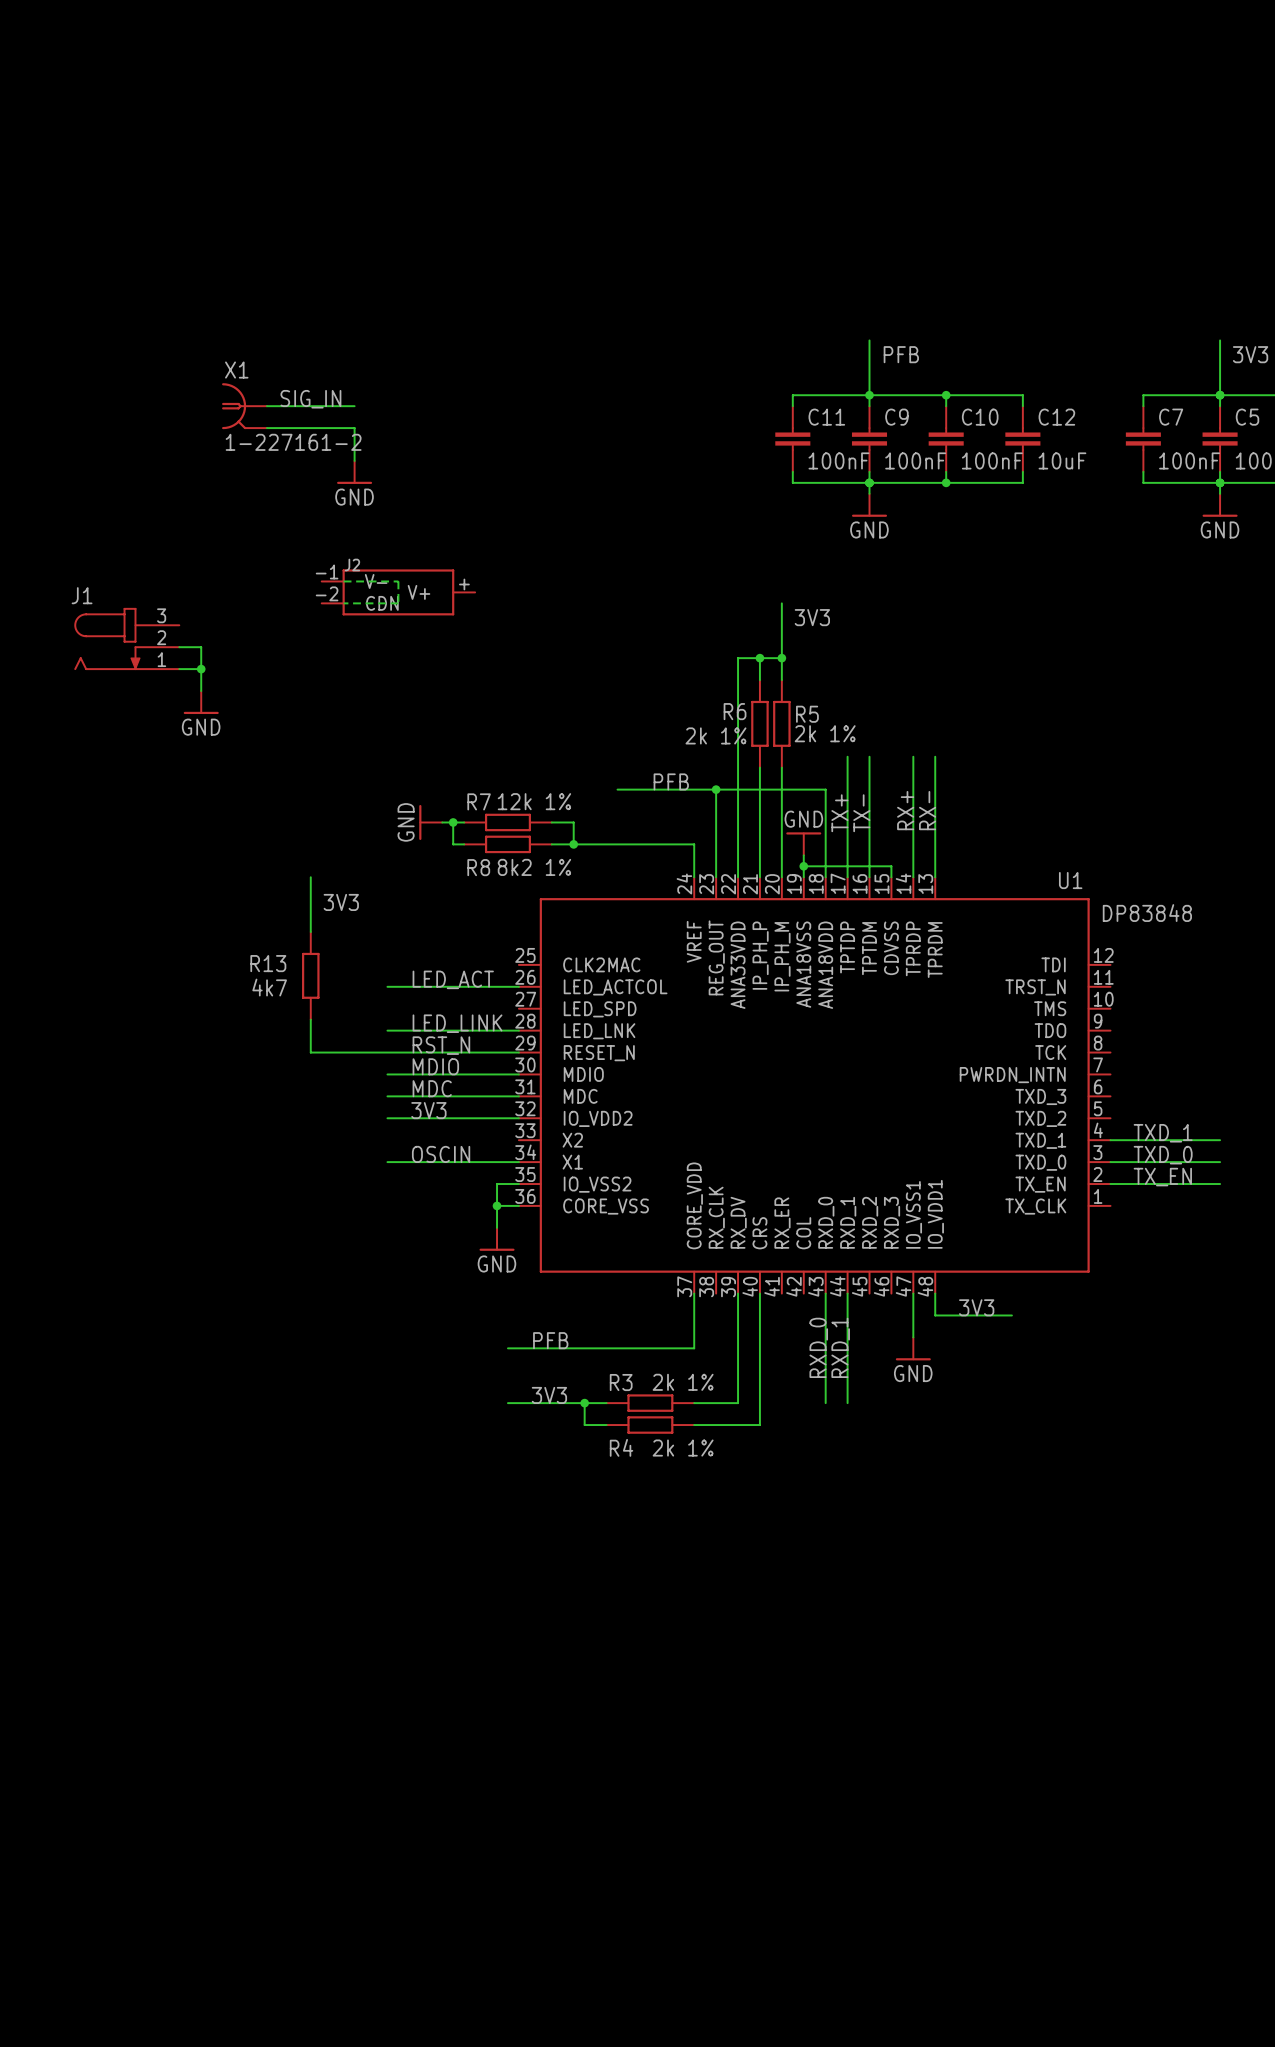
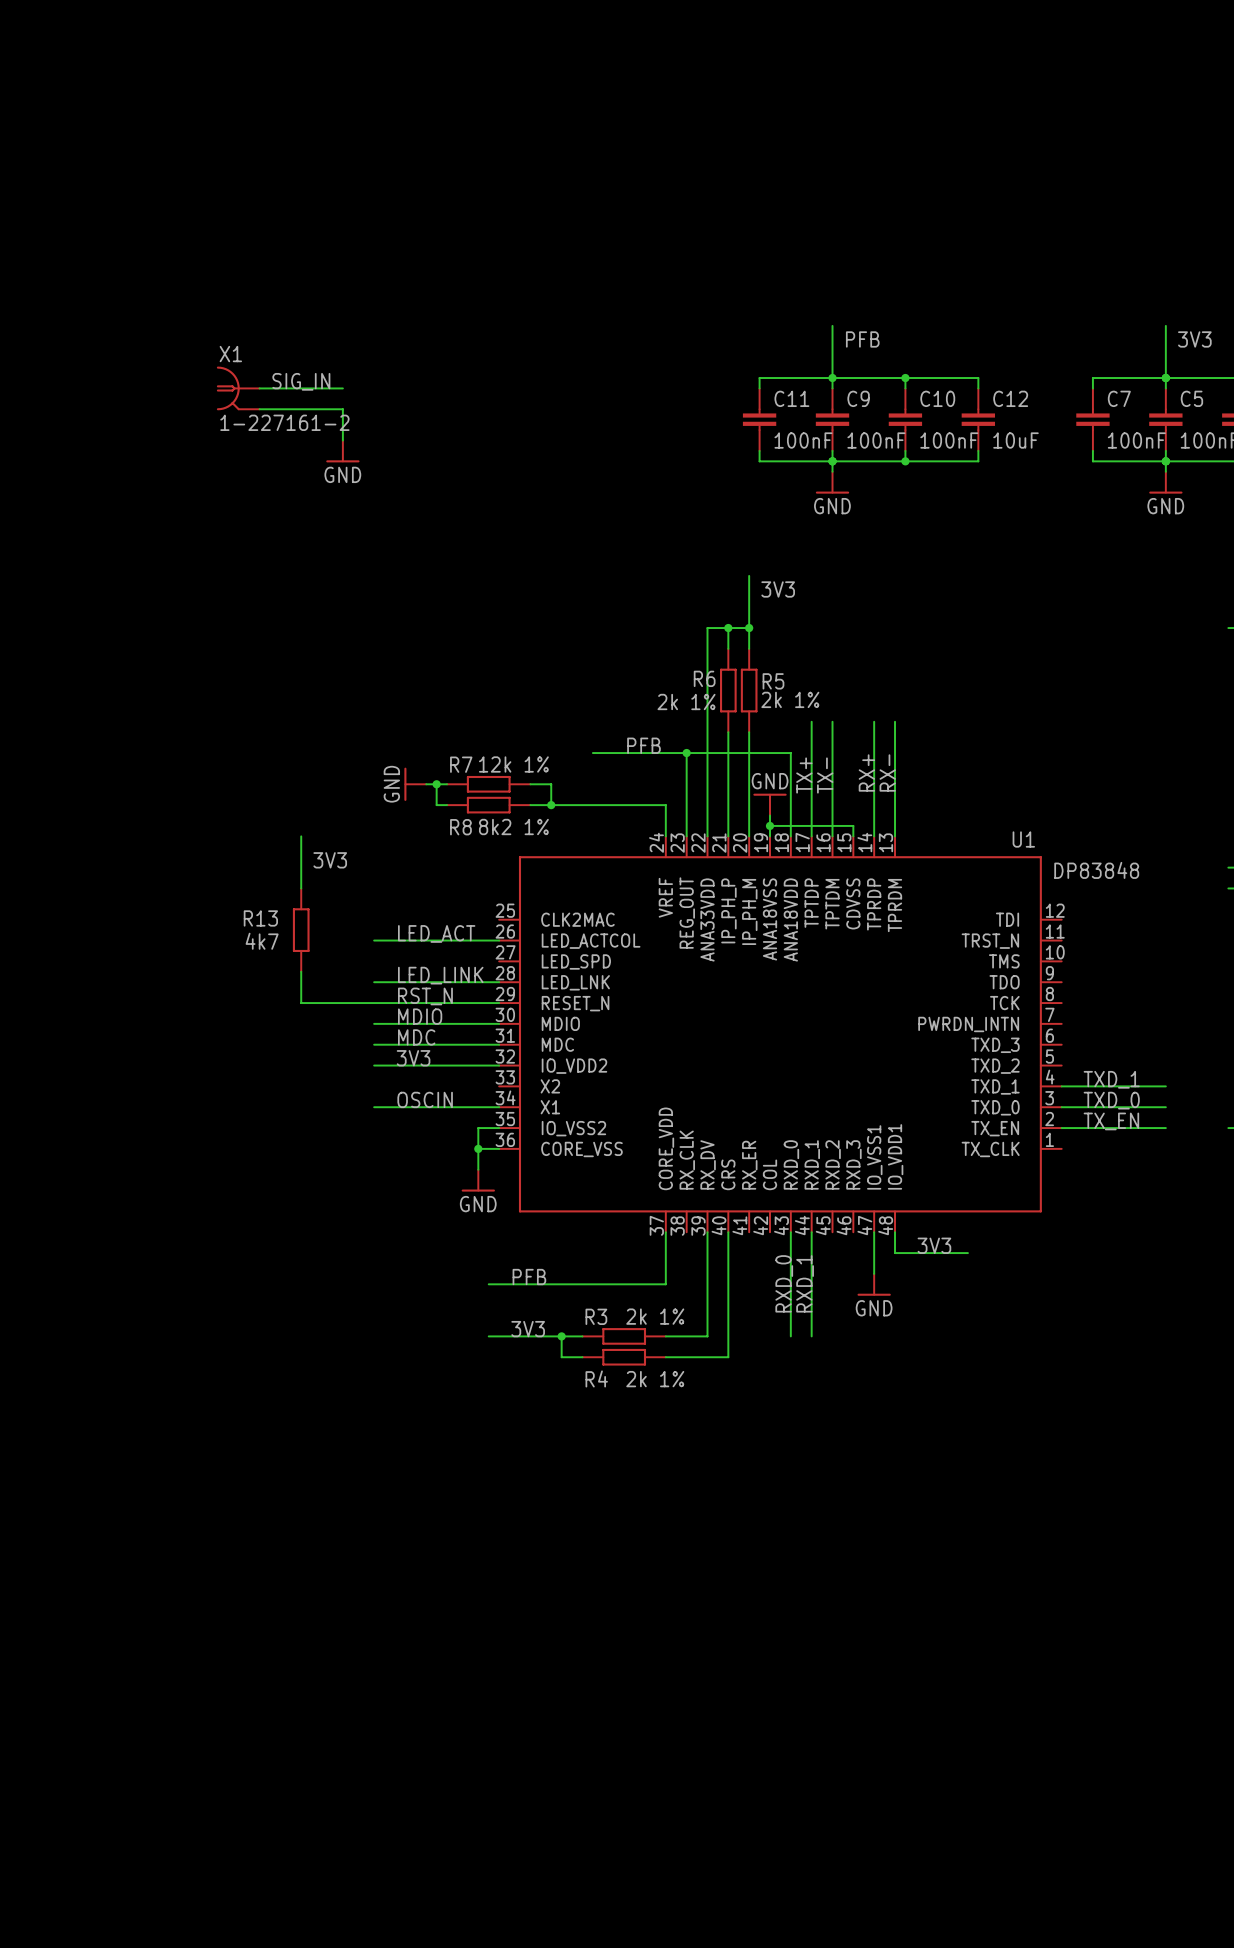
J2: (398, 592) -> none
J1: (126, 638) -> none
wire: (179, 647) (201, 647) (201, 691) -> none
wire: (179, 669) (201, 669) -> none
junction: (201, 669) -> none
power symbol: GND (201, 702) -> none

